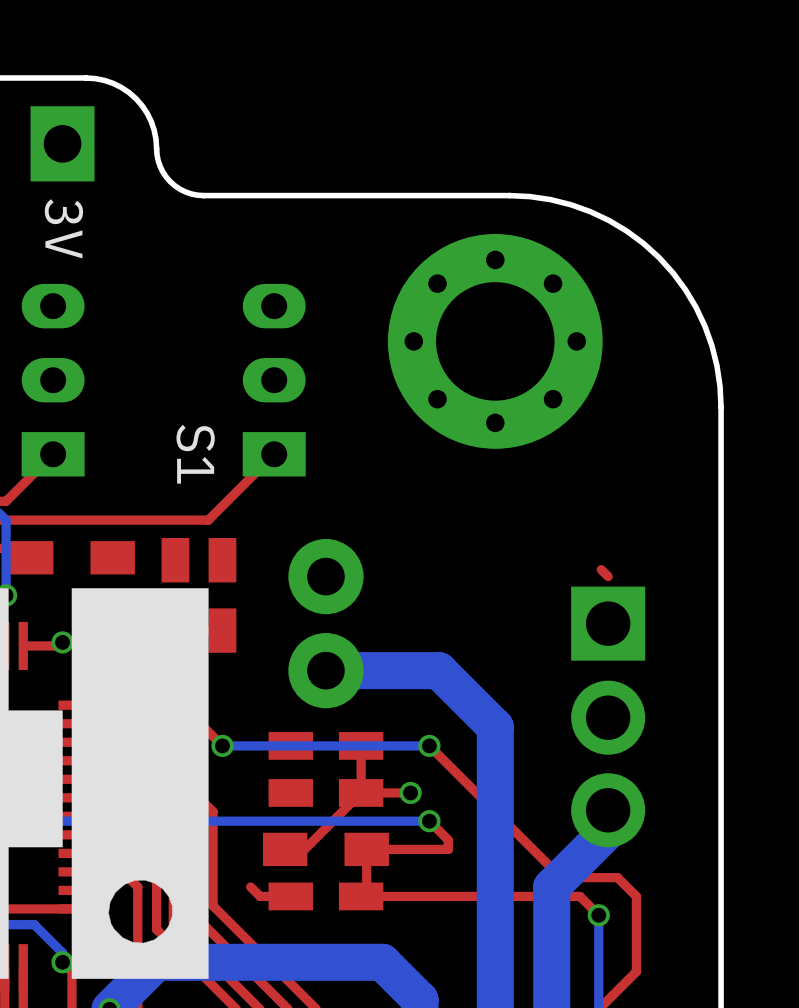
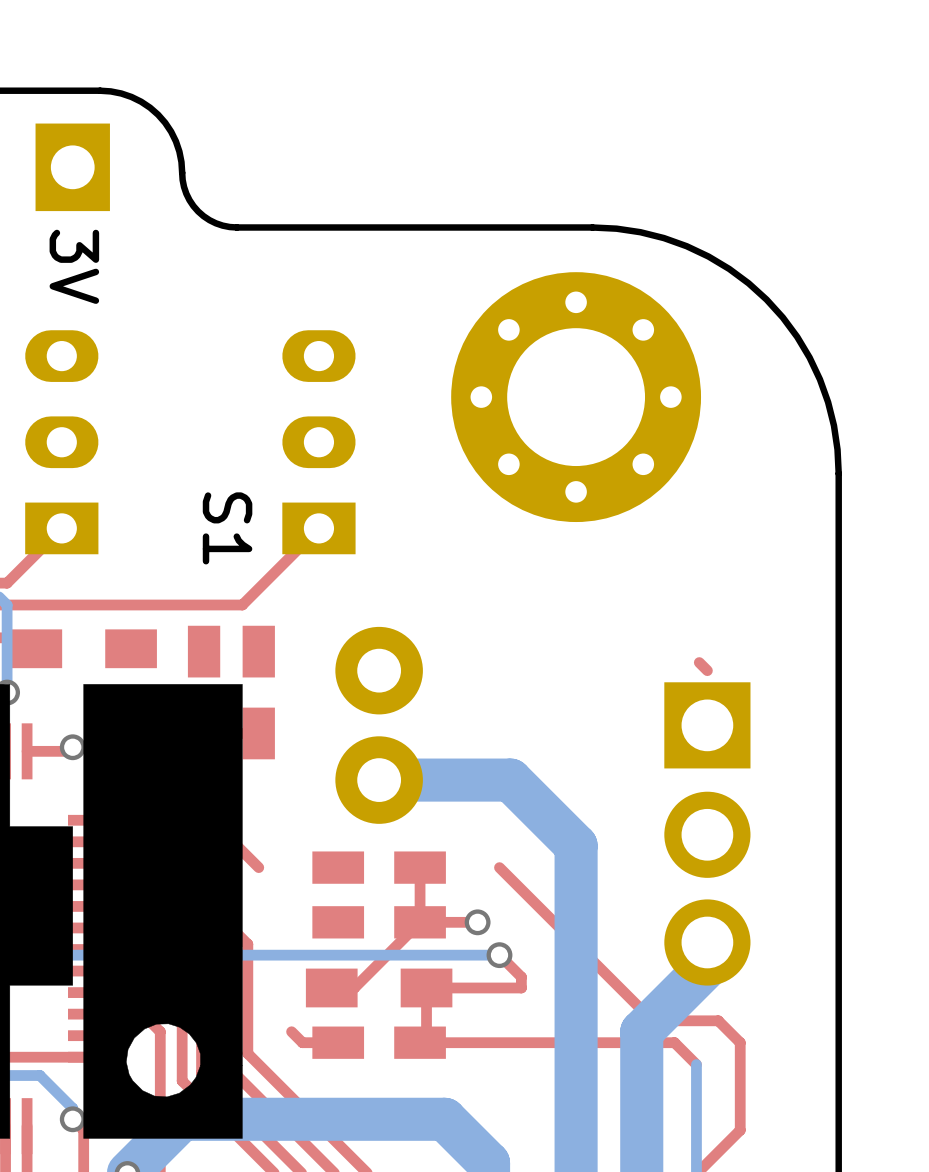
via: (222, 745) -> none
bottom track: (429, 745) (222, 745) -> none
via: (429, 745) -> none
via: (598, 915) -> none

